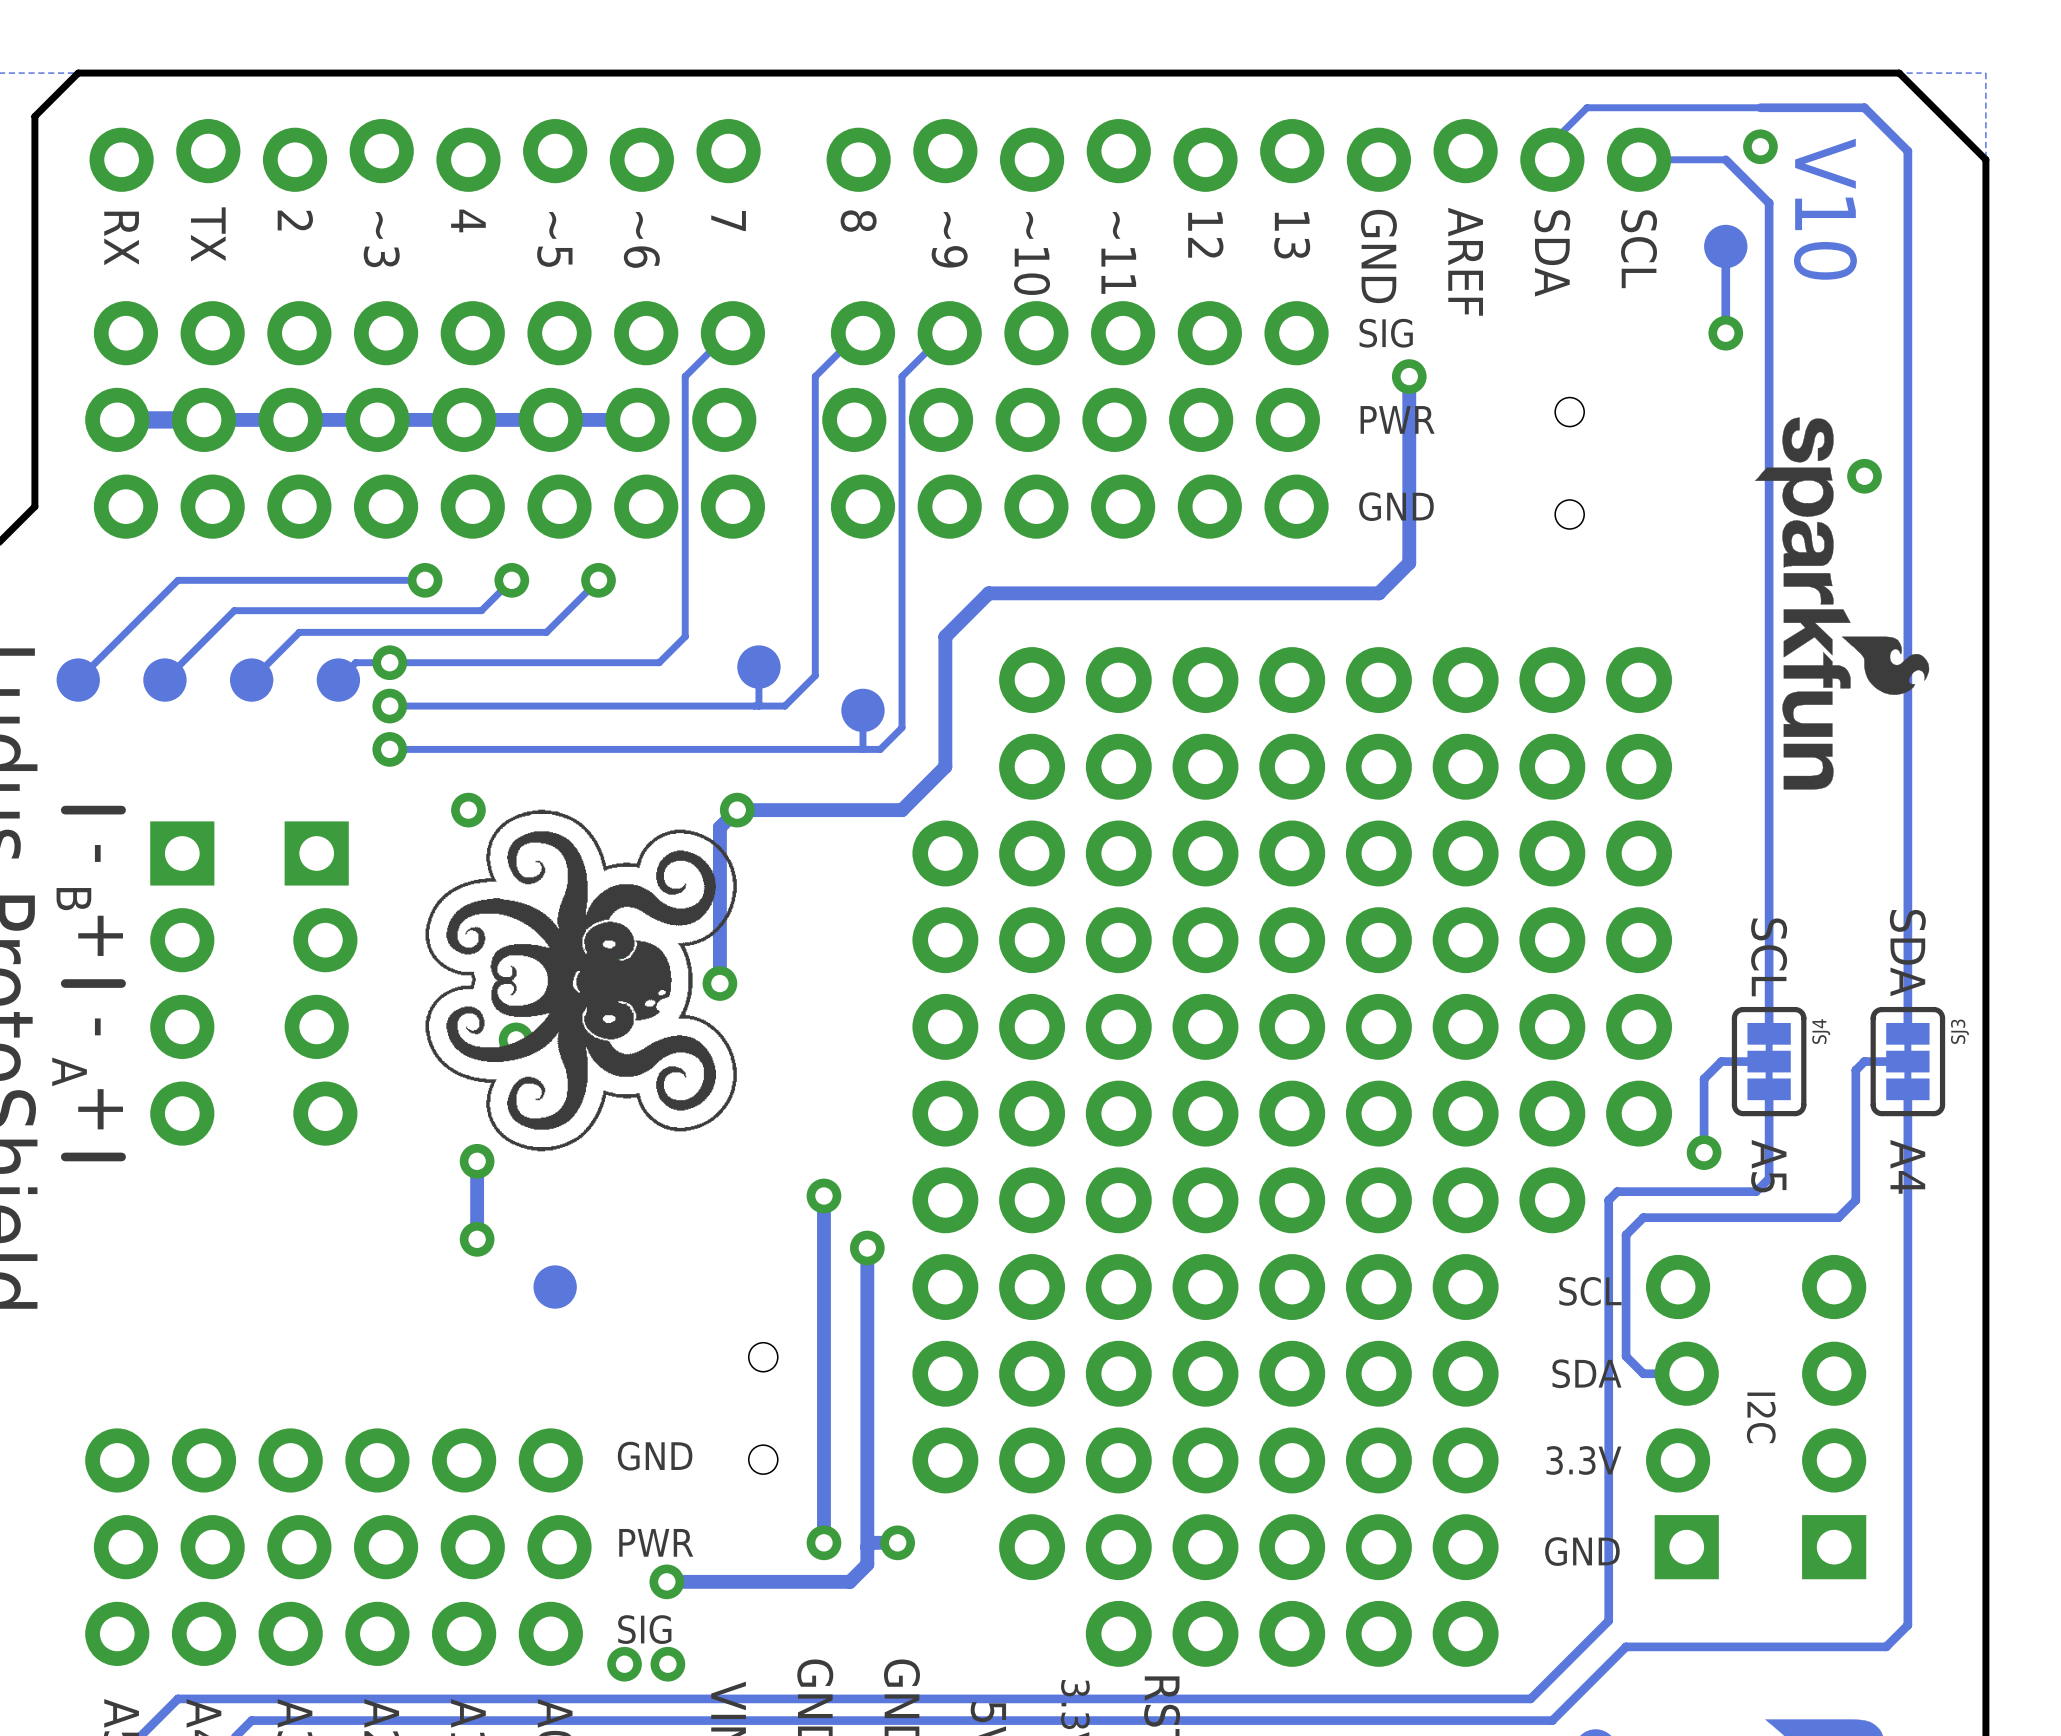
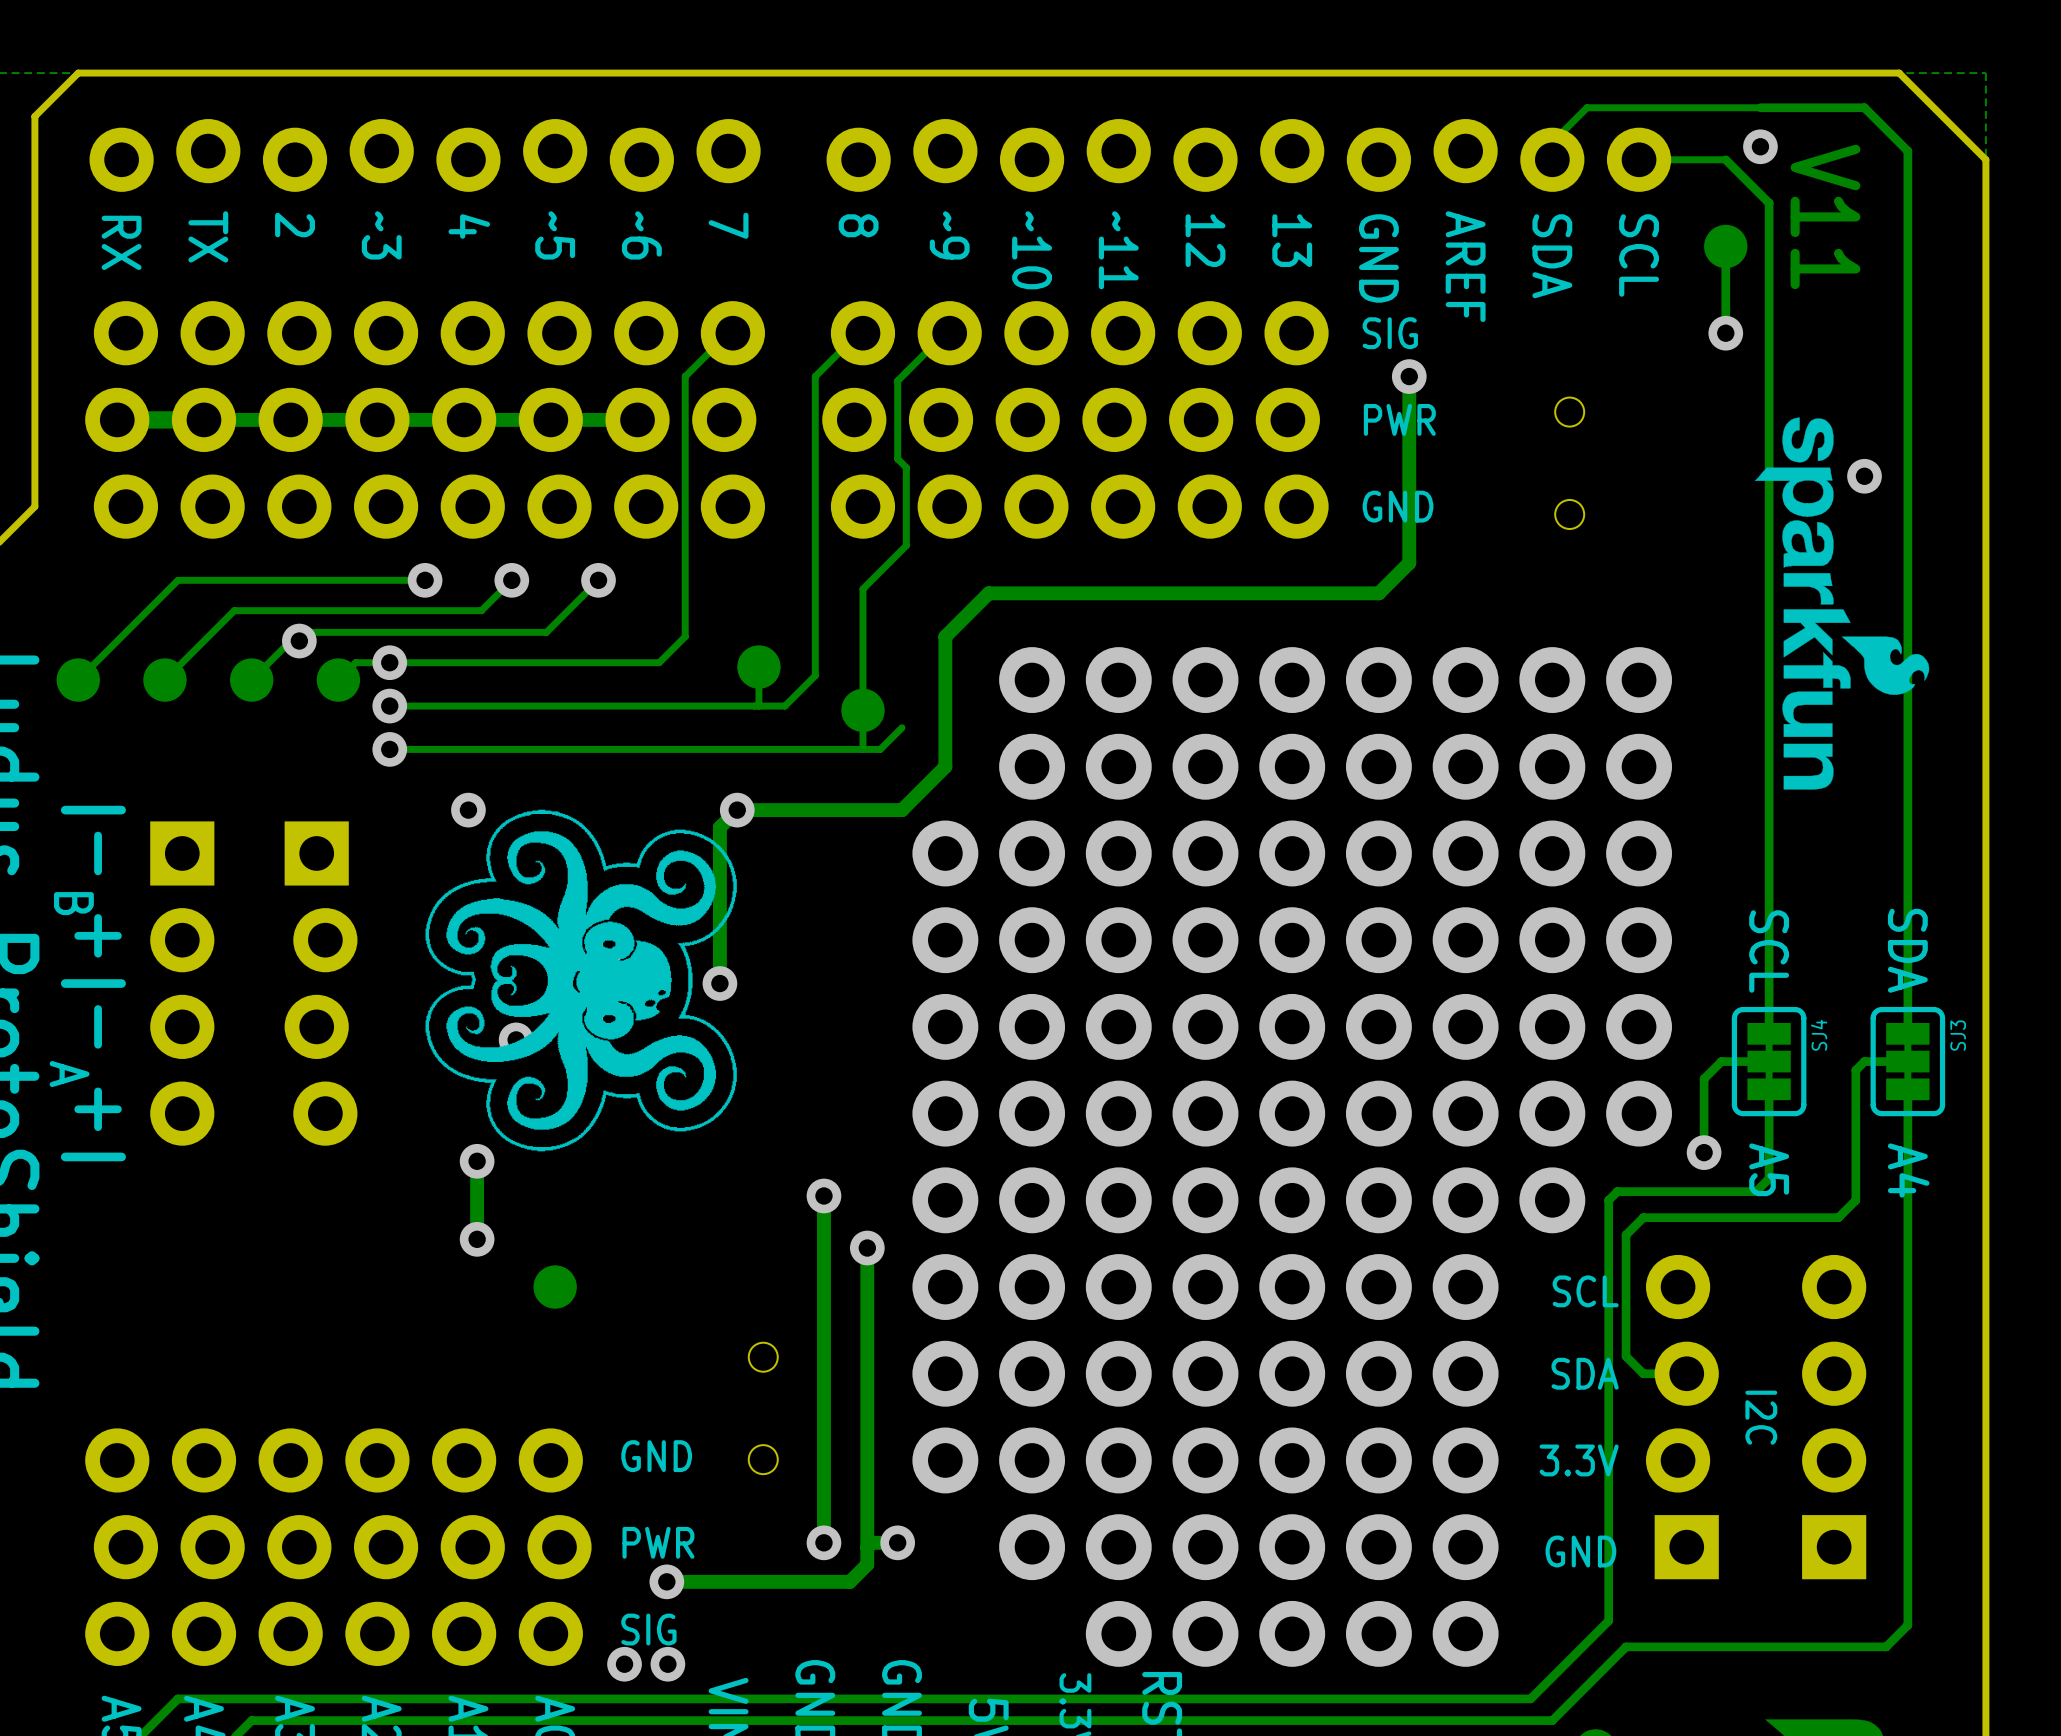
text: V10 (1825, 209) -> V11 (1825, 216)
track: (902, 376) (902, 727) -> (902, 376) (897, 380) (897, 458) (906, 467) (906, 545) (862, 589) (862, 710)
via: none -> (299, 641)

